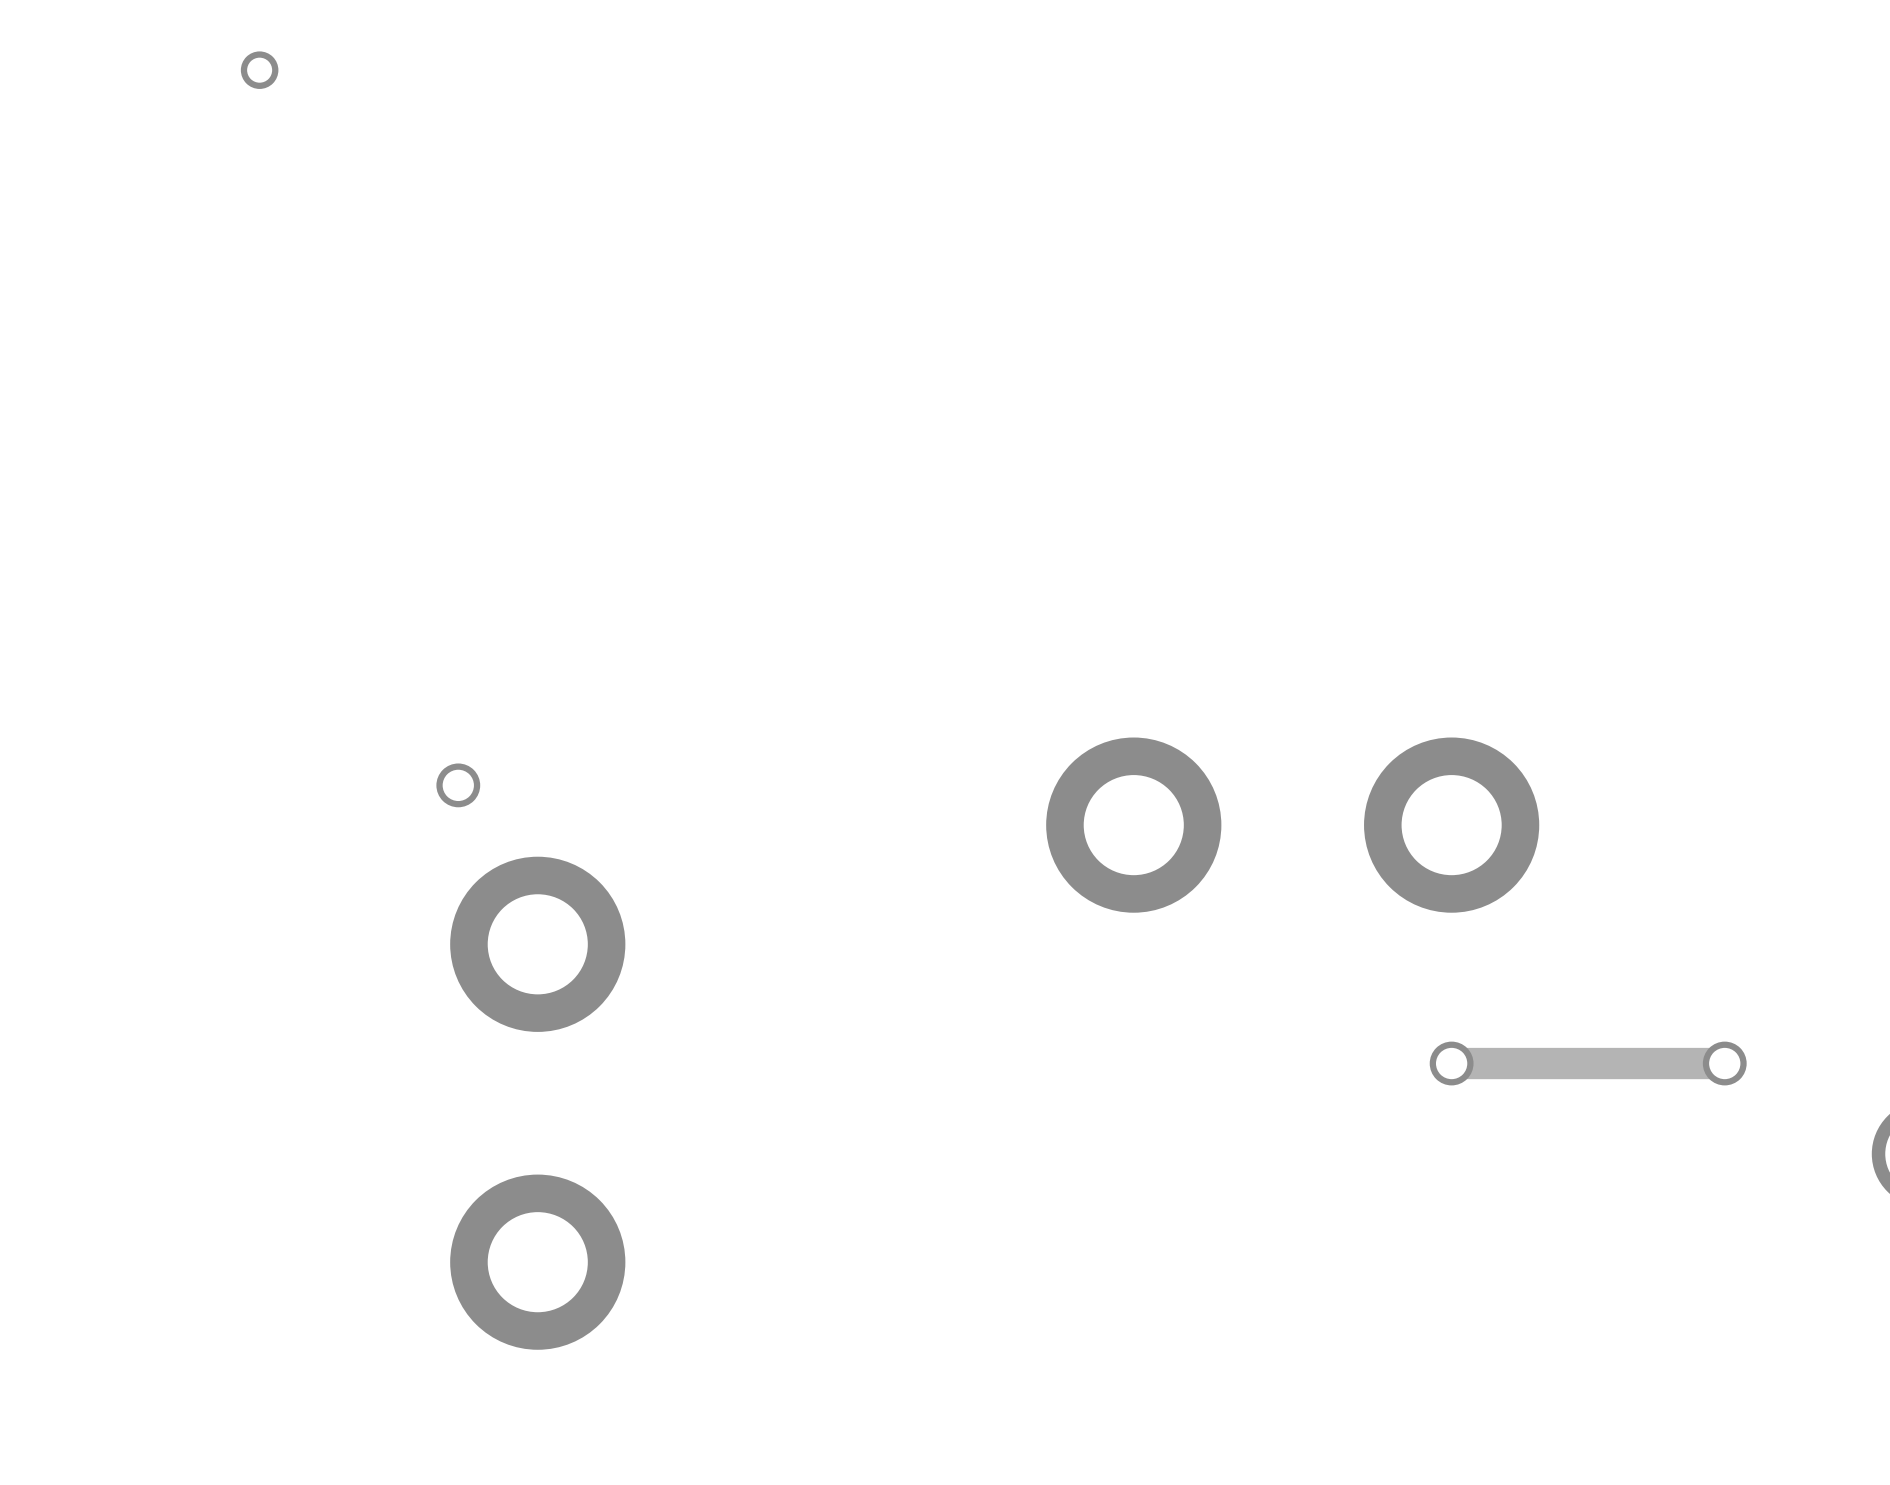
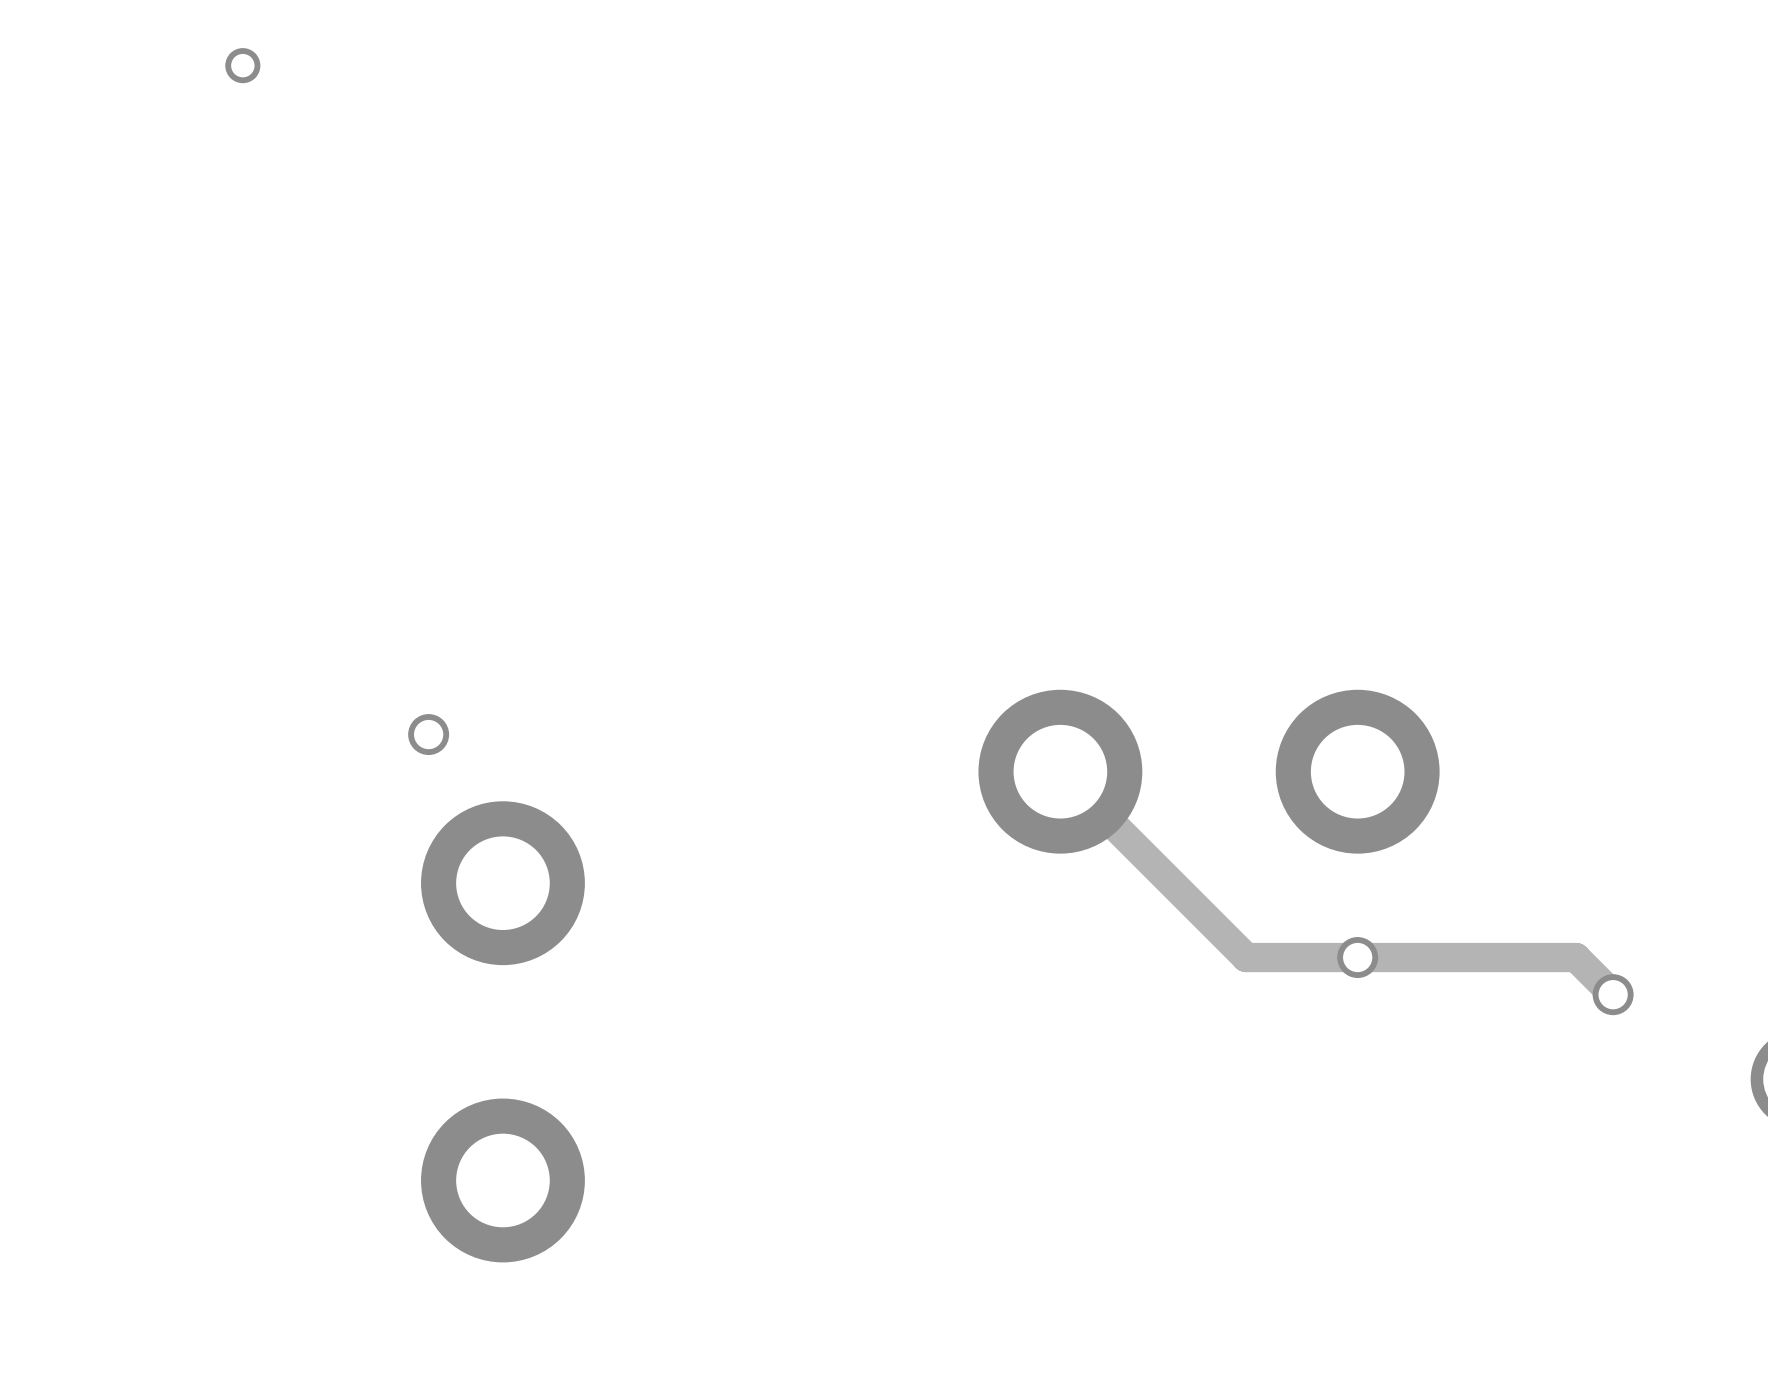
via position: (1451, 1063) -> (1357, 957)
track: (1724, 1063) (1451, 1063) -> (1613, 994) (1575, 957) (1246, 957) (1060, 771)

